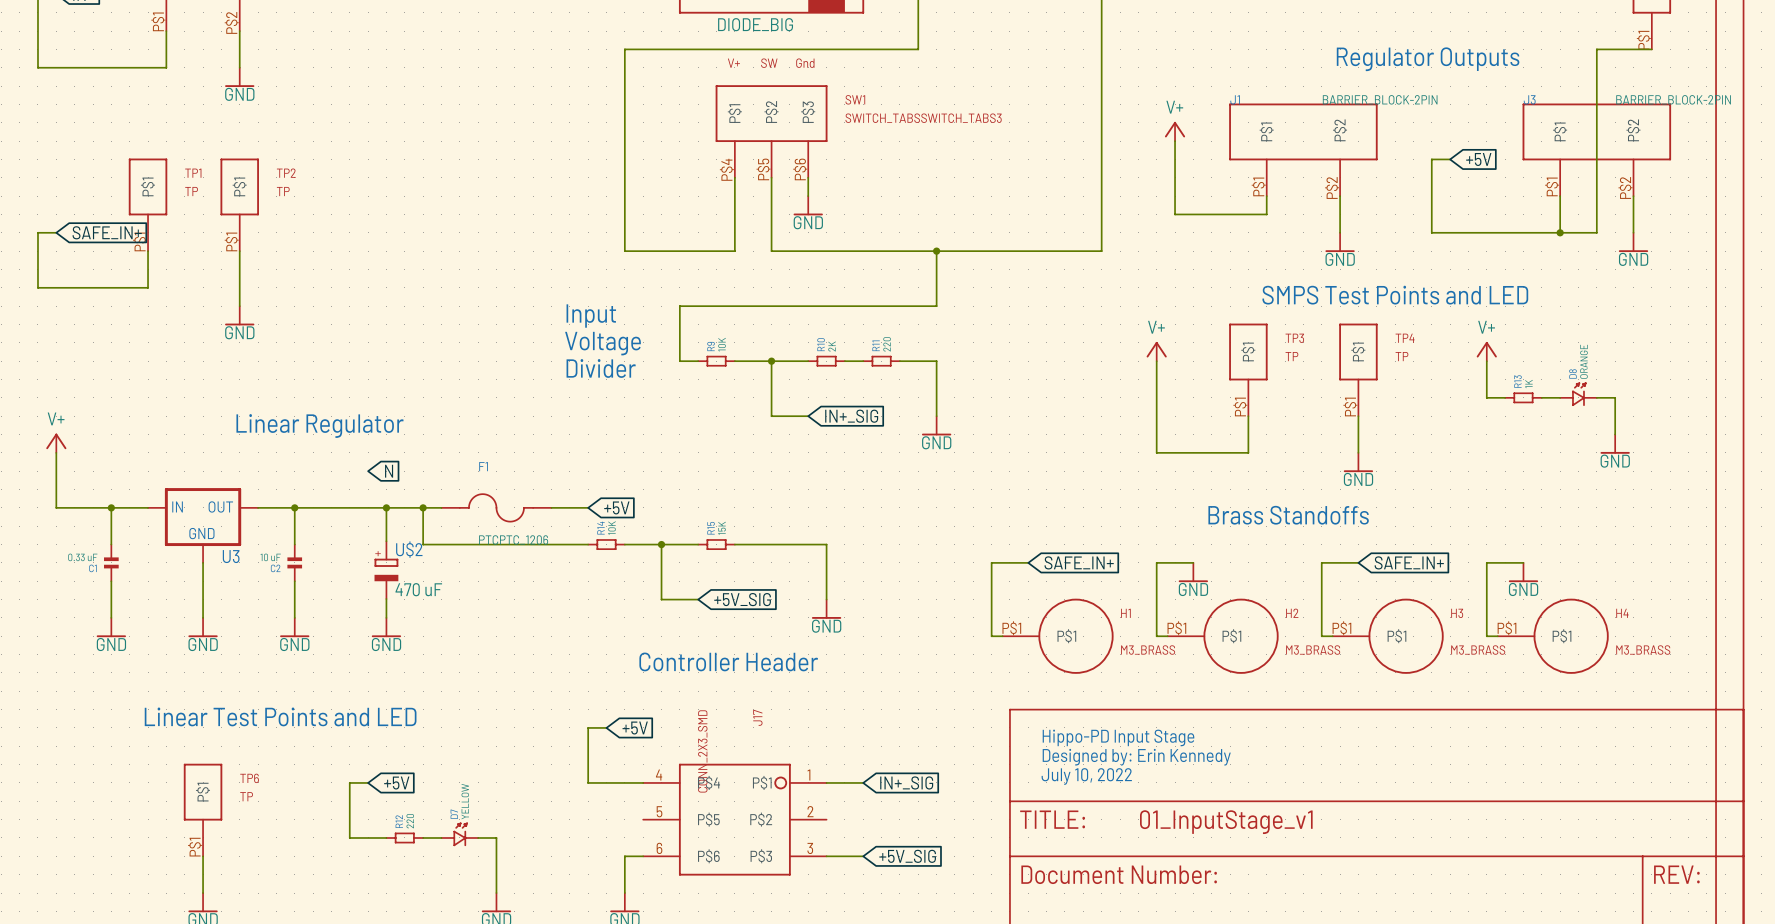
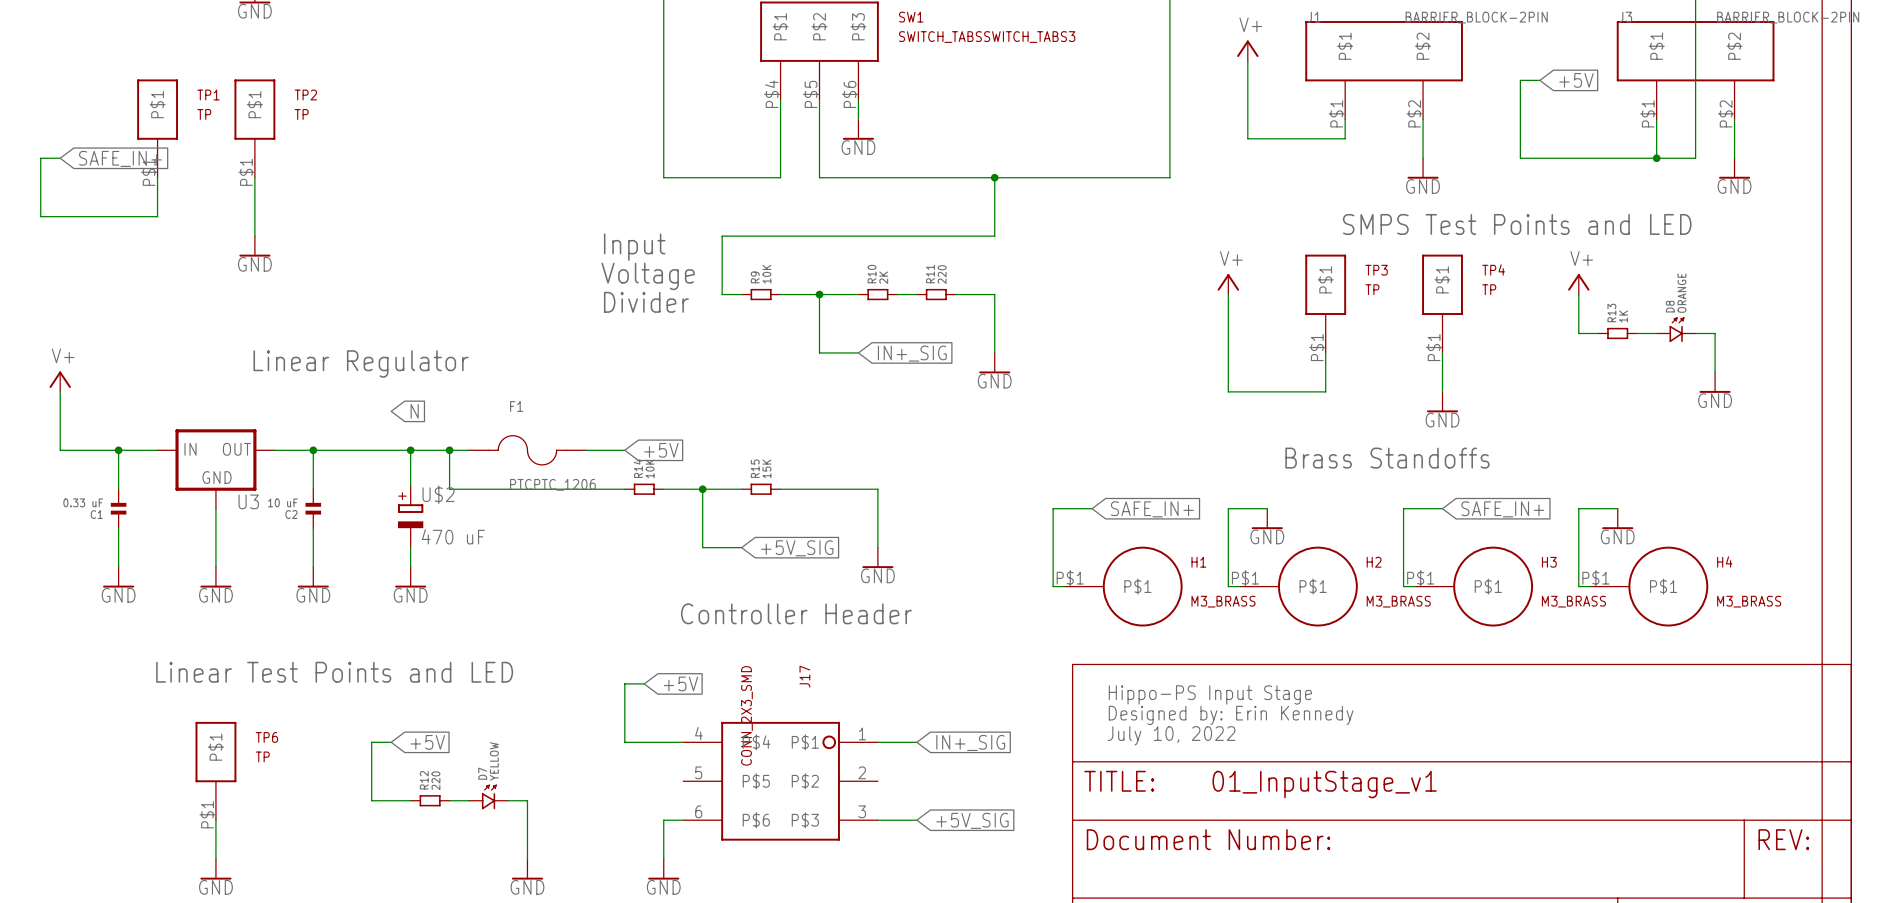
text: Hippo-PD Input Stage (1118, 737) -> Hippo-PS Input Stage (1210, 694)

